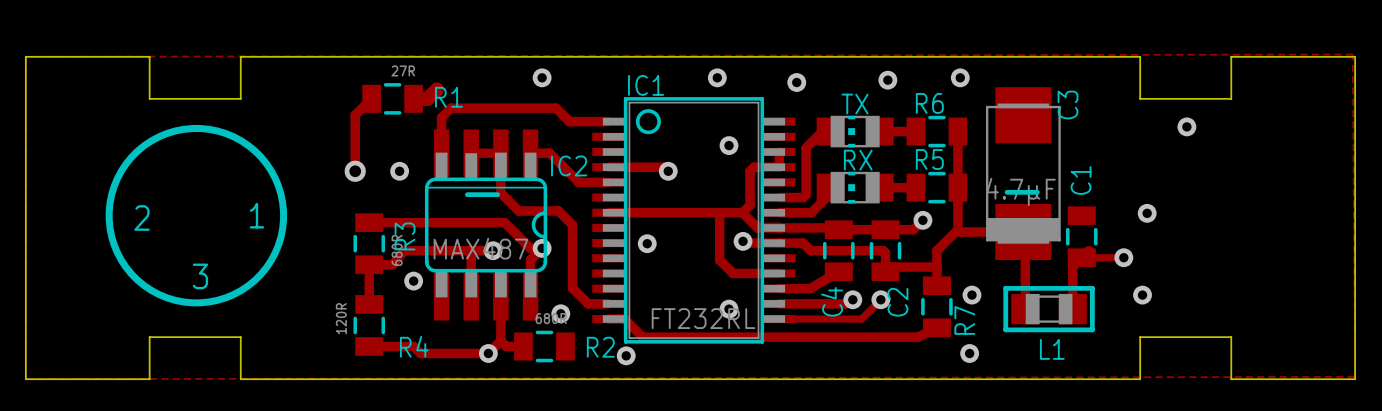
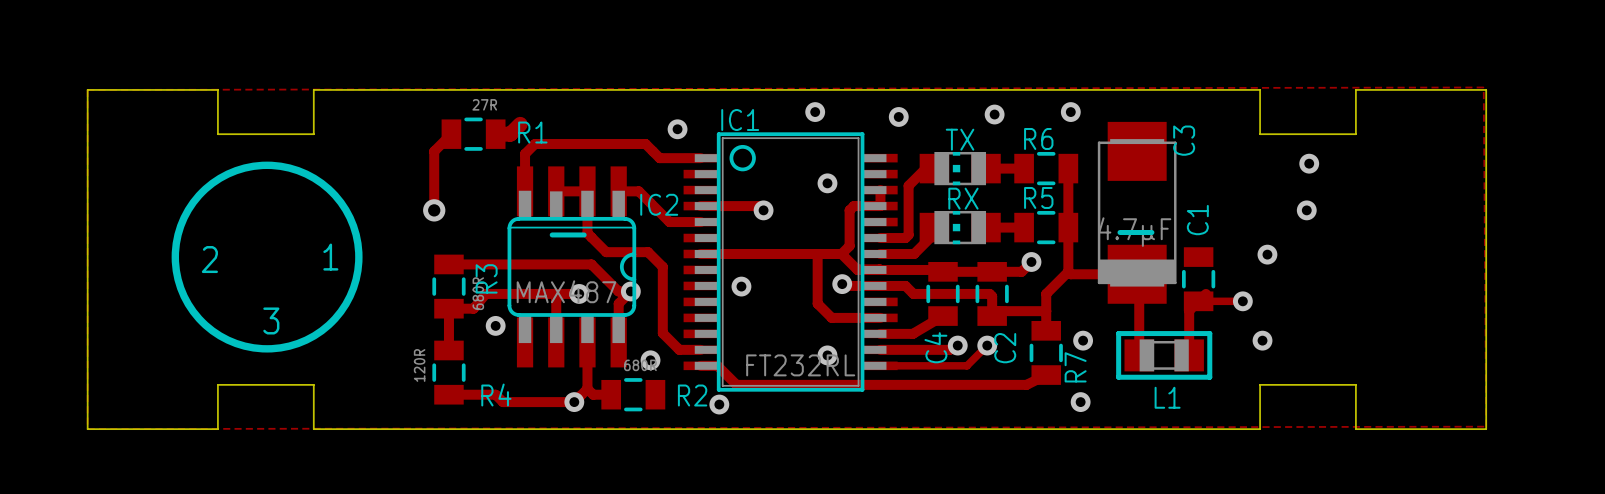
via position: (542, 77) -> (677, 129)
via: (399, 171) -> none
via: none -> (1306, 210)

